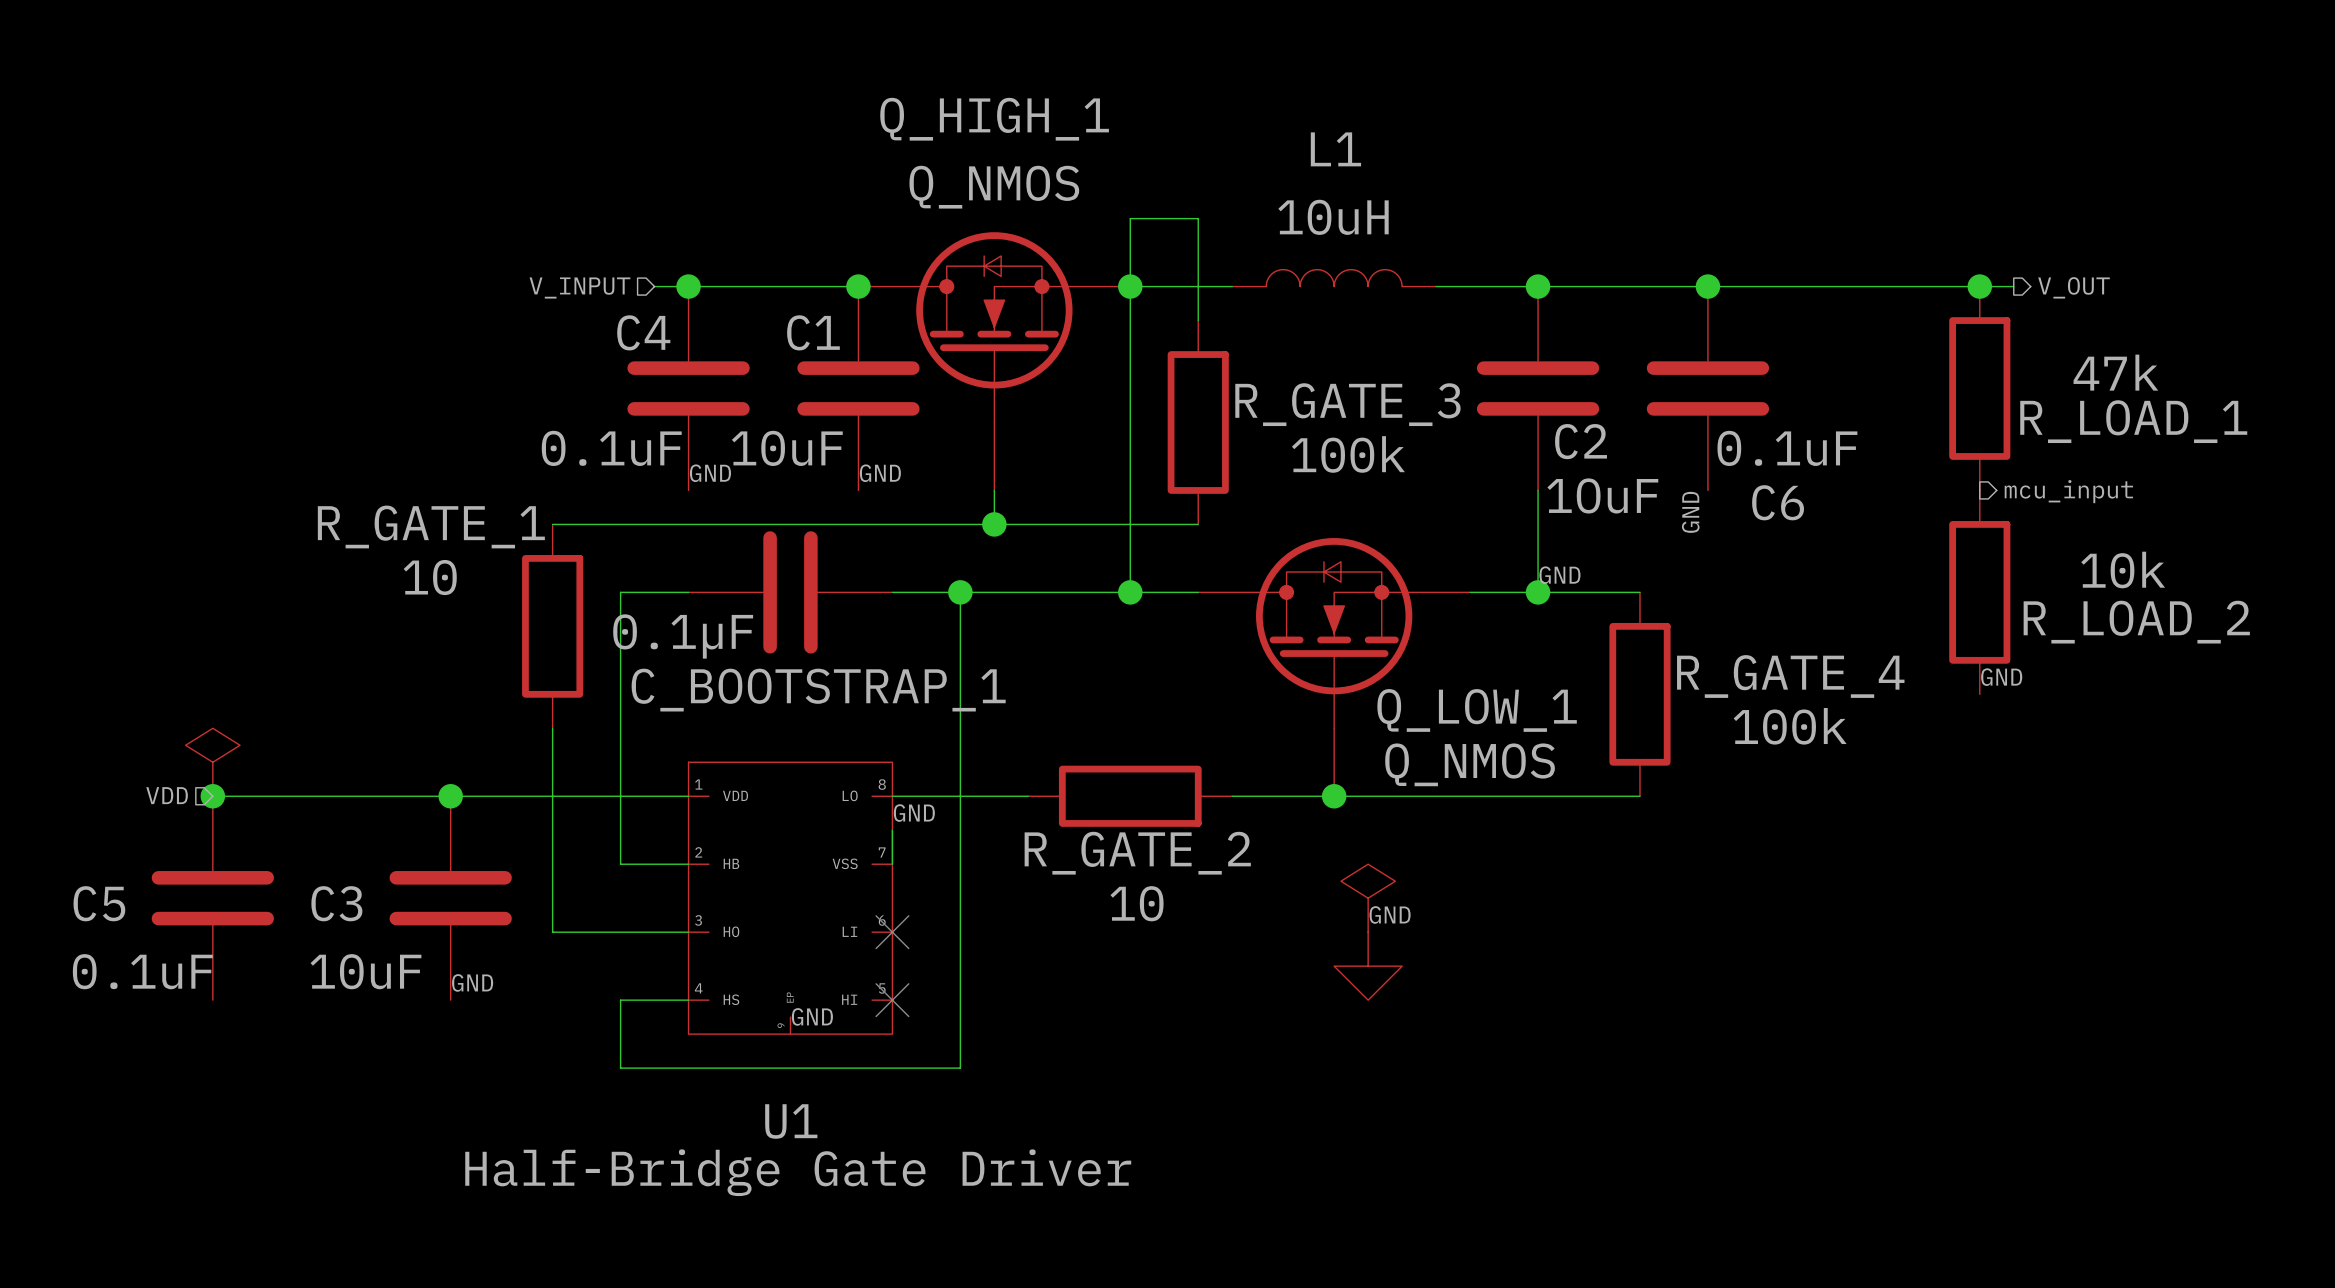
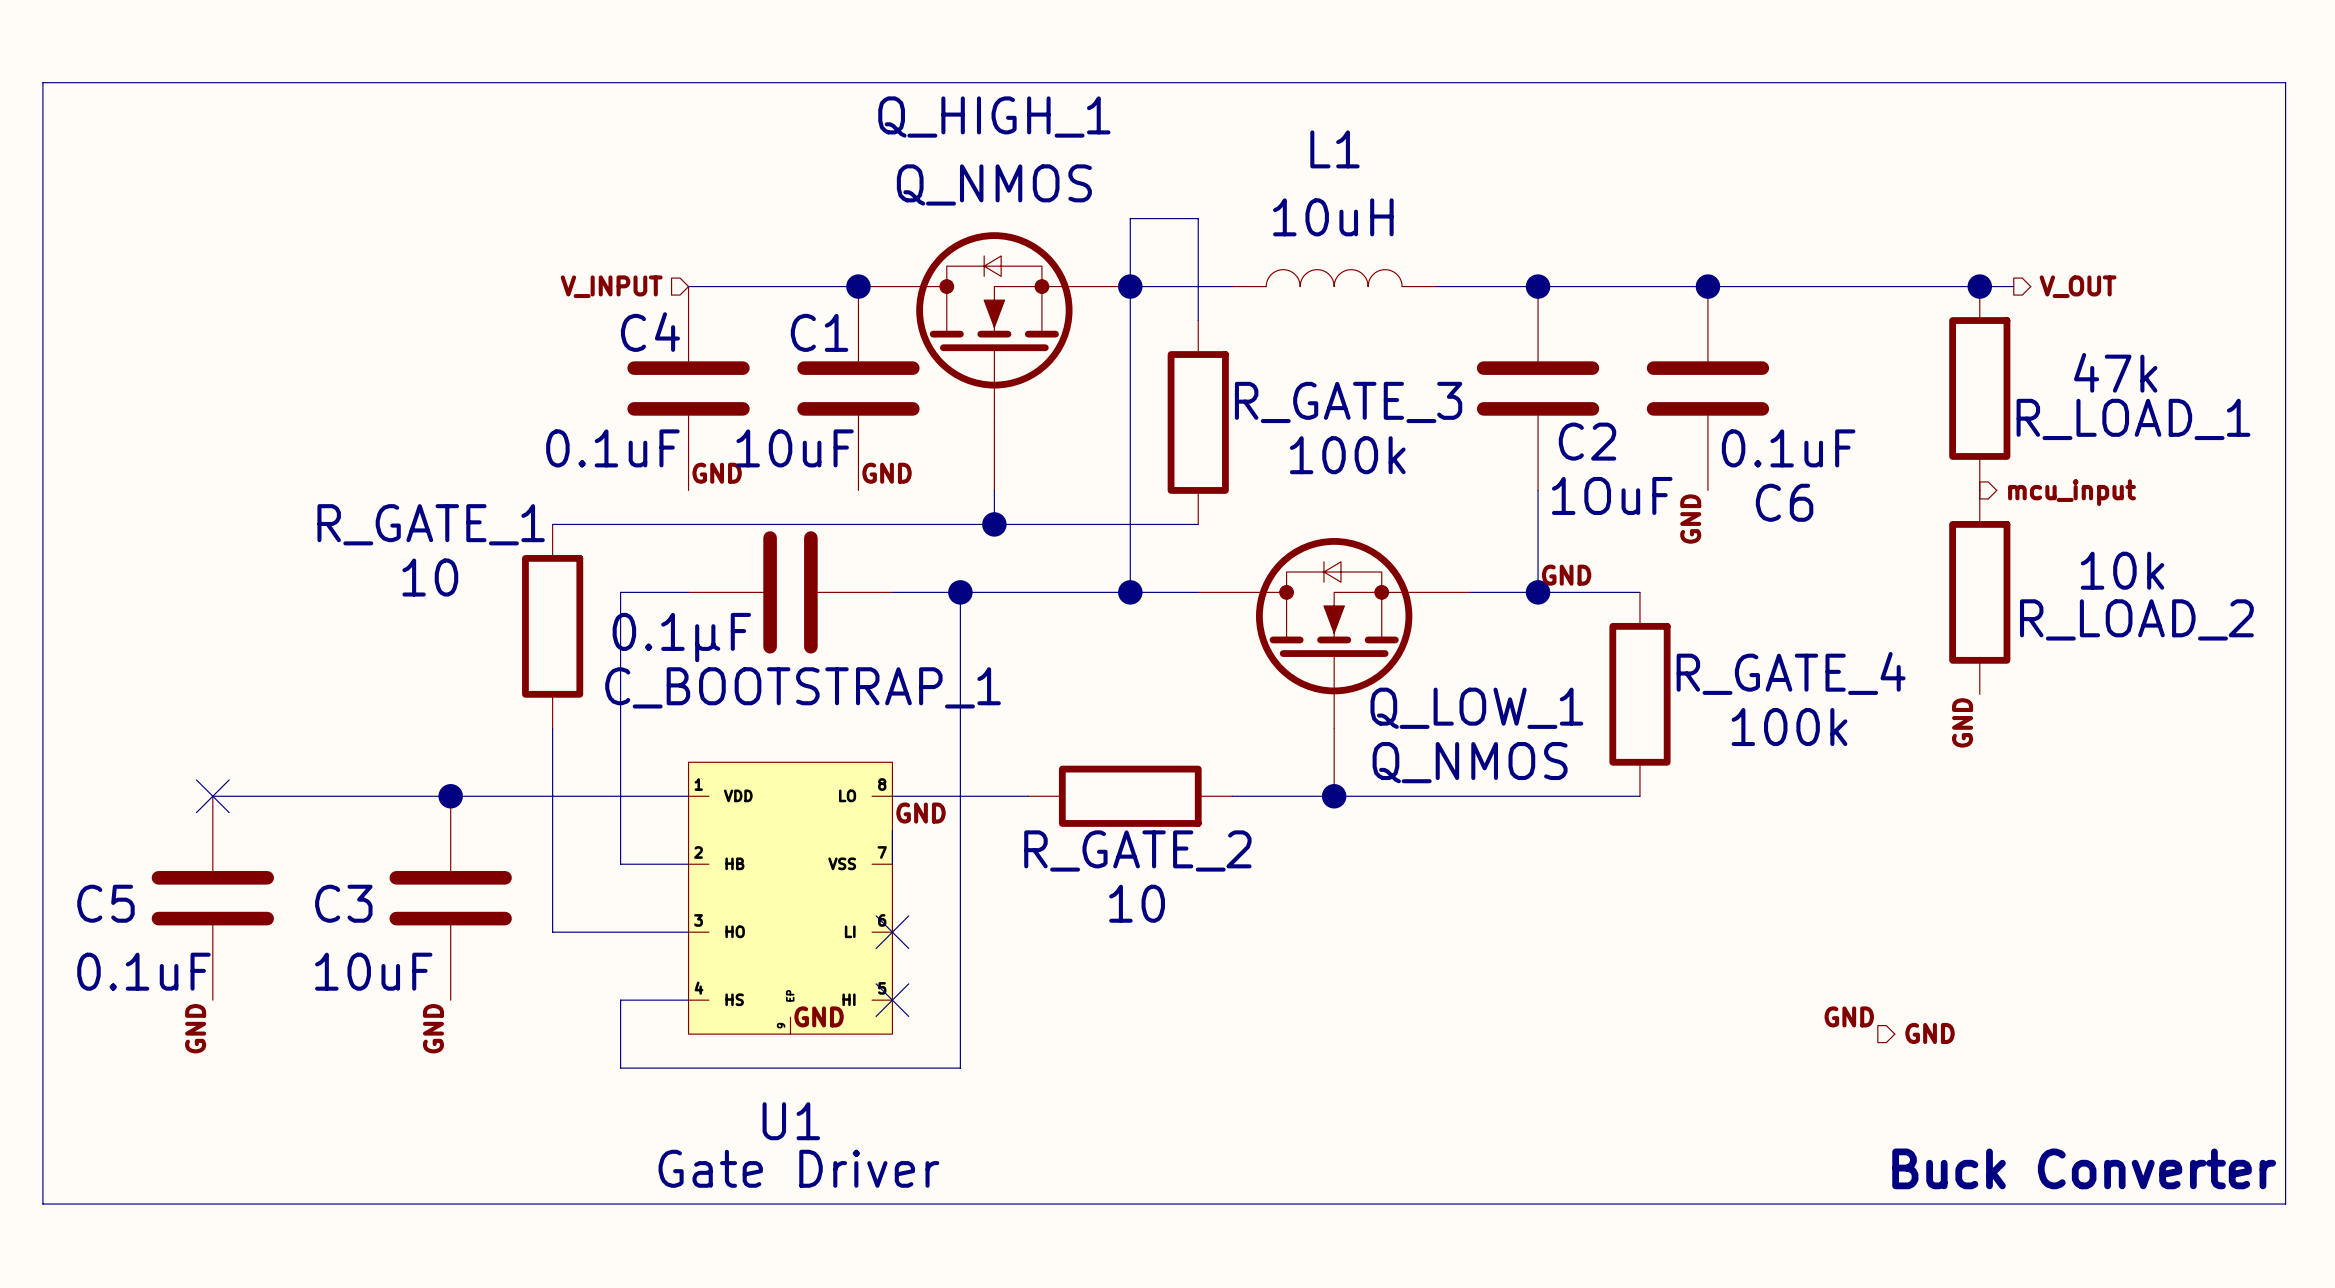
line: none -> (42, 82) (2285, 82) (2285, 1204) (42, 1204) (42, 82)
wire: (654, 286) (688, 286) -> none
junction: (688, 286) -> none
hierarchical label position: V_INPUT (579, 287) -> V_INPUT (611, 286)
label rotation: 0° (2001, 677) -> 90° counterclockwise (1962, 722)
label position: GND (2001, 677) -> GND (1962, 722)
power symbol: (212, 762) -> none
hierarchical label: VDD (167, 795) -> none
junction: (212, 796) -> none
no-connect mark: none -> (212, 796)
power symbol: (1368, 898) -> none
label position: GND (1390, 914) -> GND (1849, 1016)
power symbol: (1368, 966) -> none
label rotation: 0° (472, 982) -> 90° counterclockwise (433, 1028)
label position: GND (472, 982) -> GND (433, 1028)
label: none -> GND (195, 1028)
hierarchical label: none -> GND (1930, 1033)
text: none -> Buck Converter (2084, 1168)
U1 value: Half-Bridge Gate Driver (798, 1172) -> Gate Driver (798, 1168)

